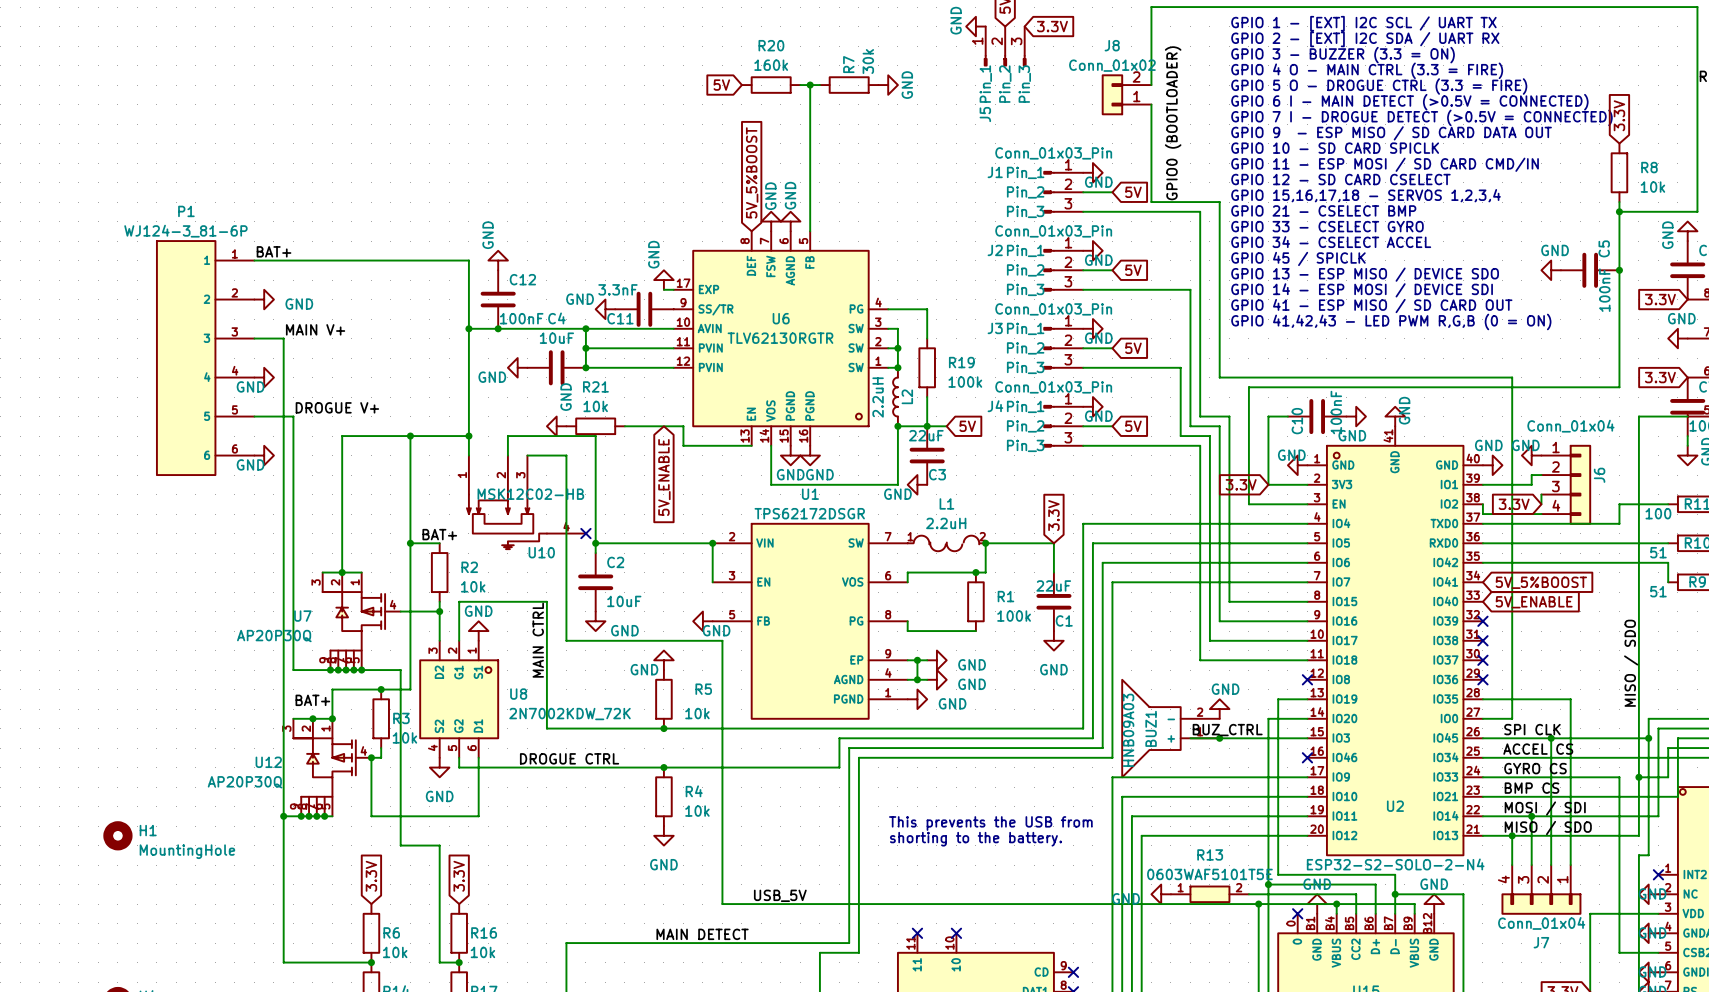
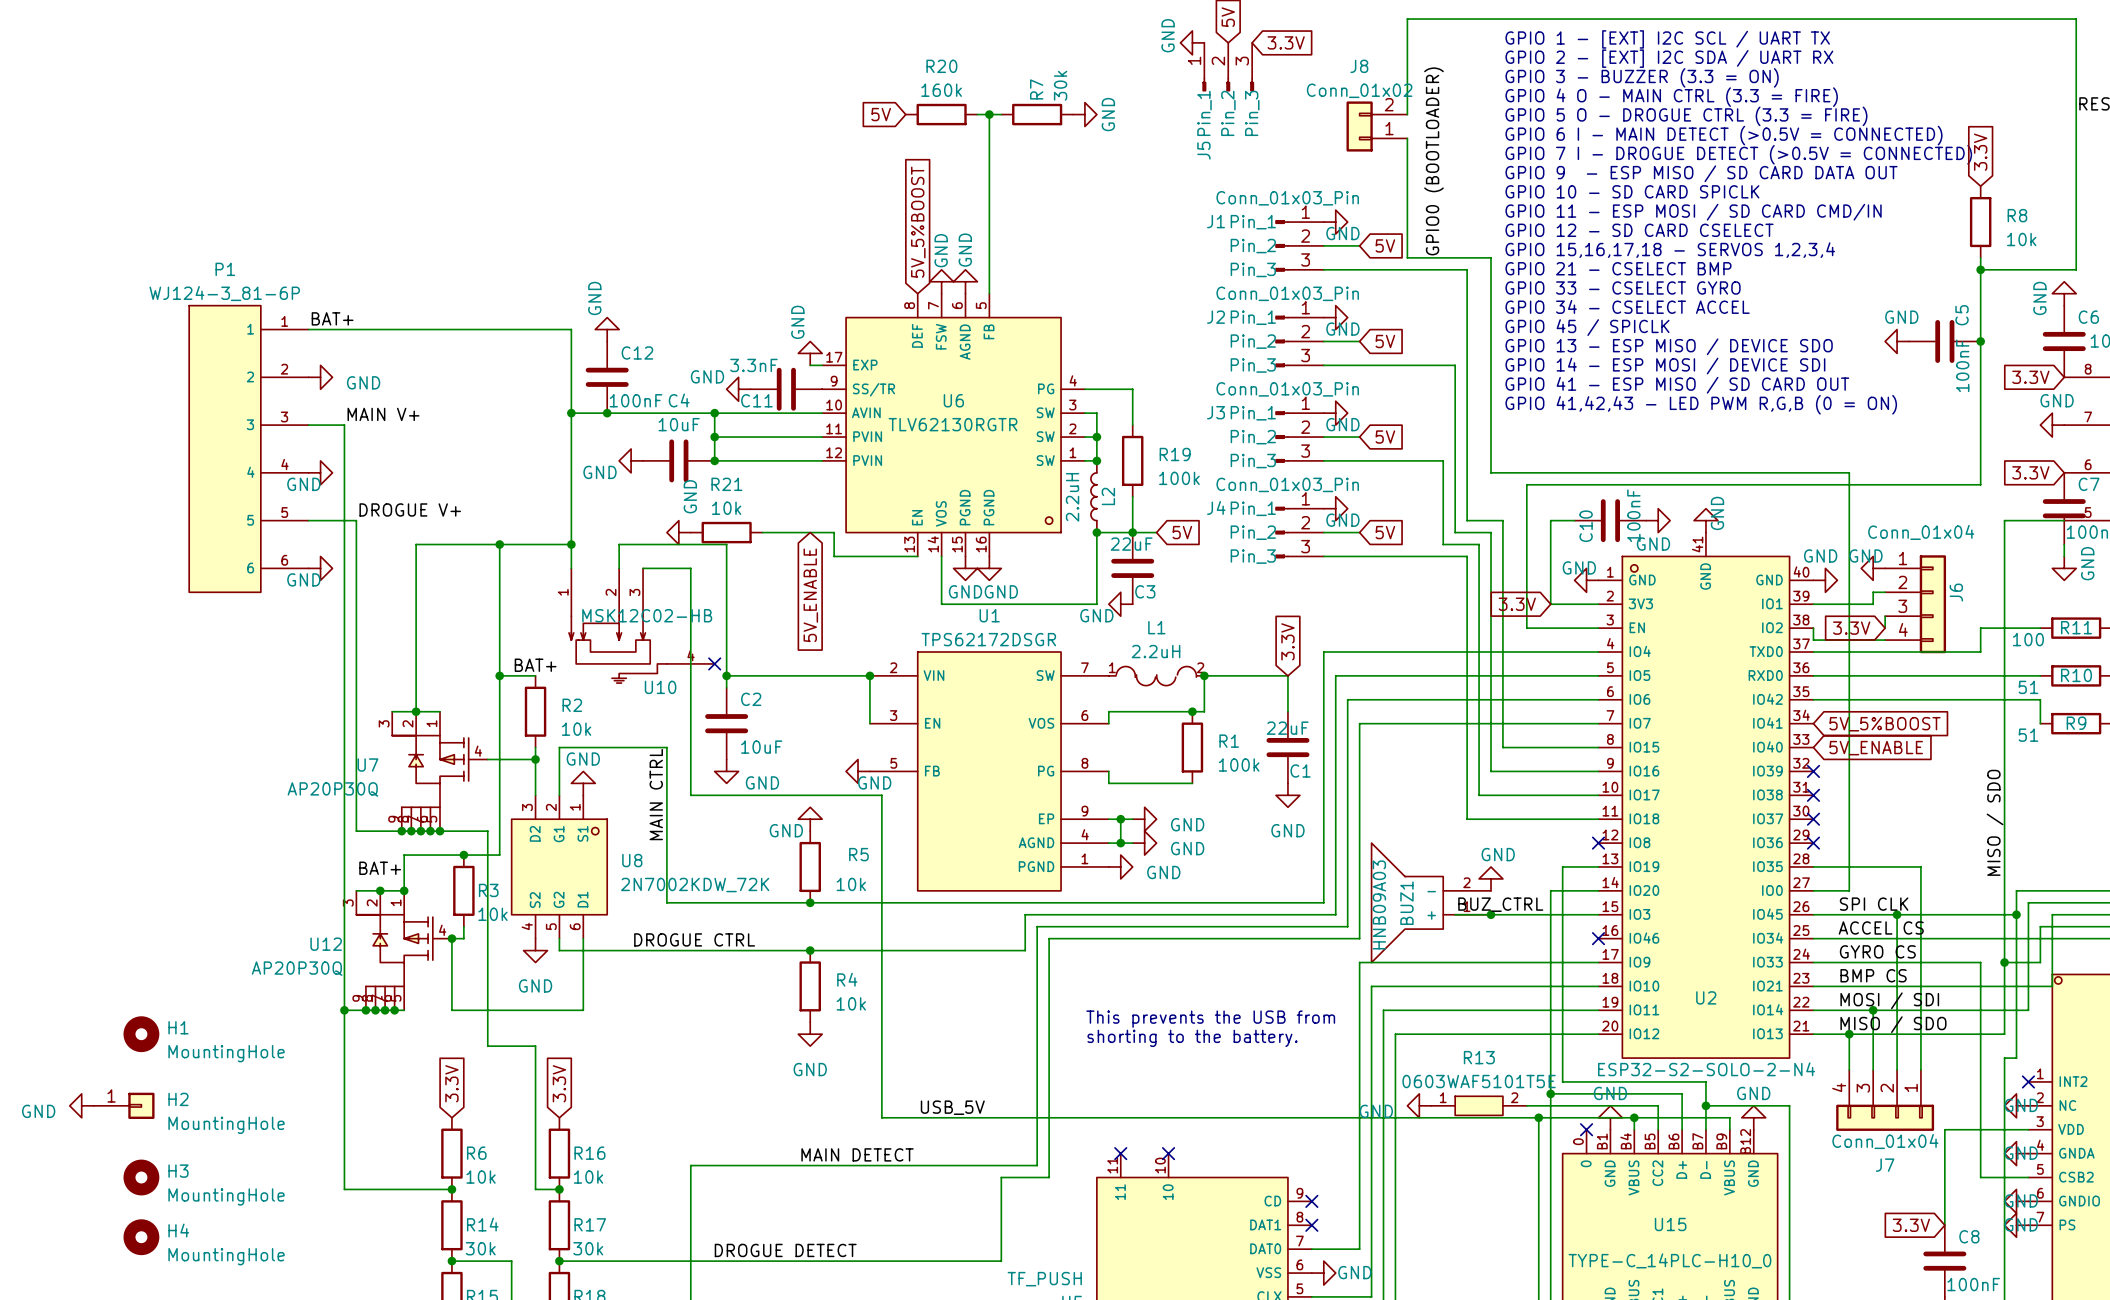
power symbol: none -> GND (81, 1105)
H2: none -> MountingHole (124, 1105)
H3: none -> MountingHole (141, 1177)

